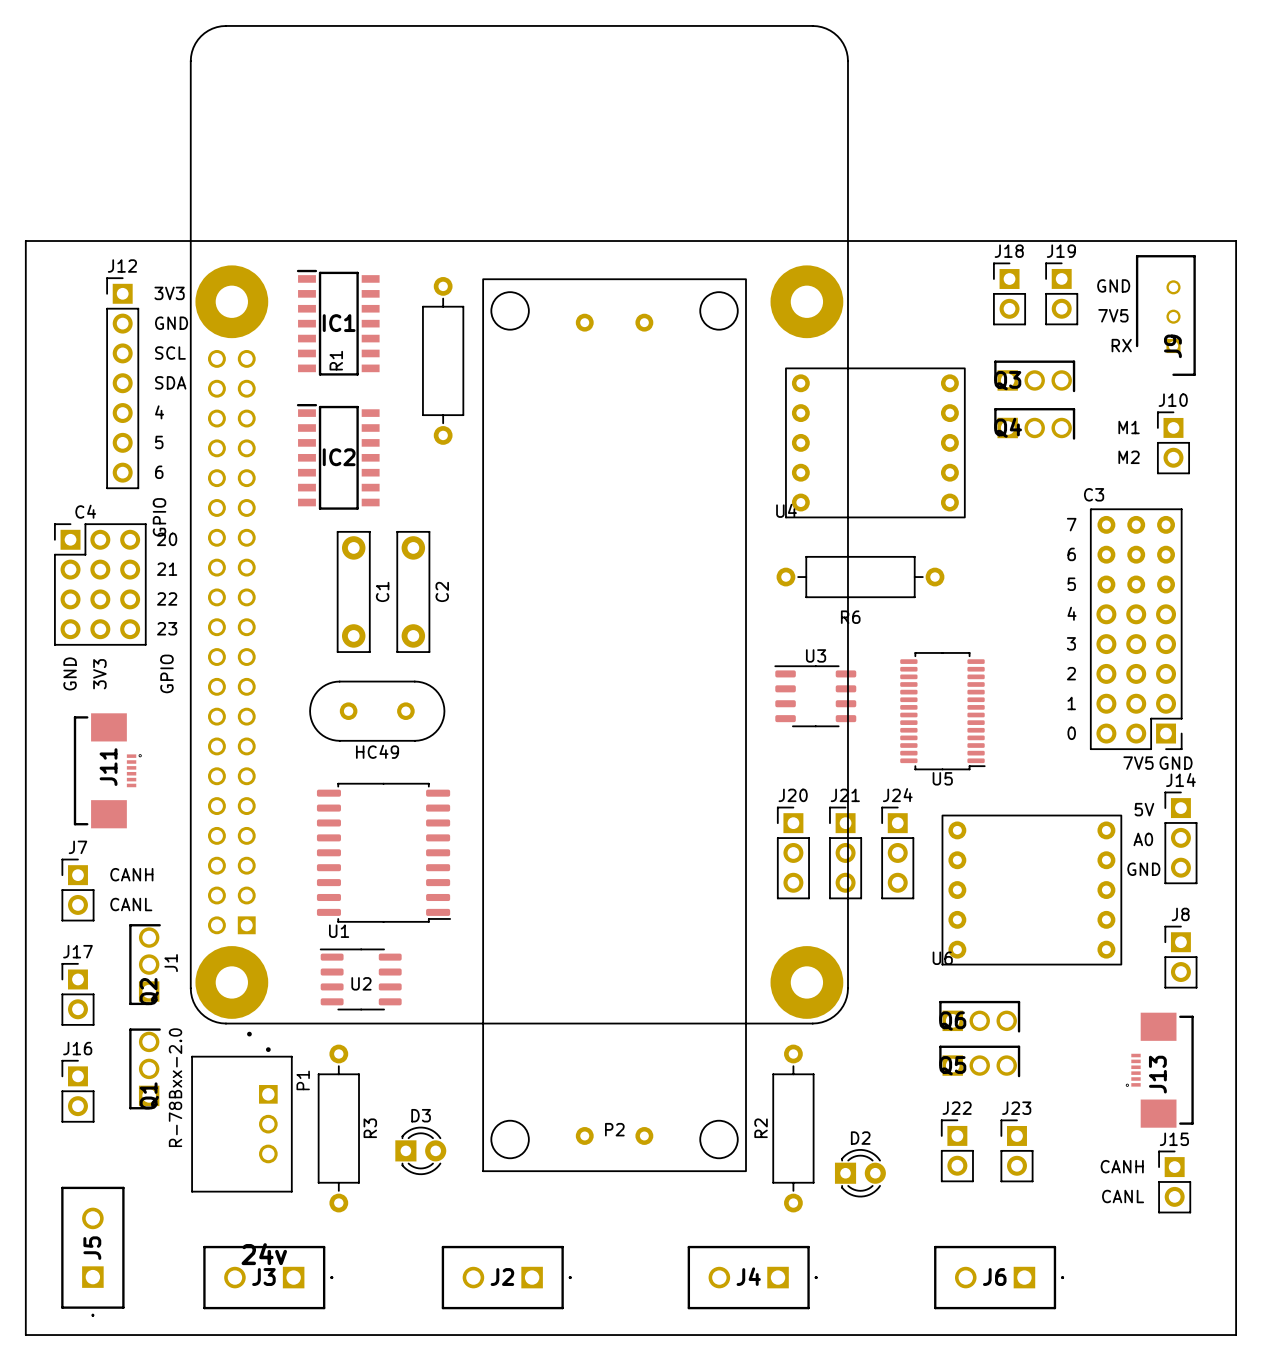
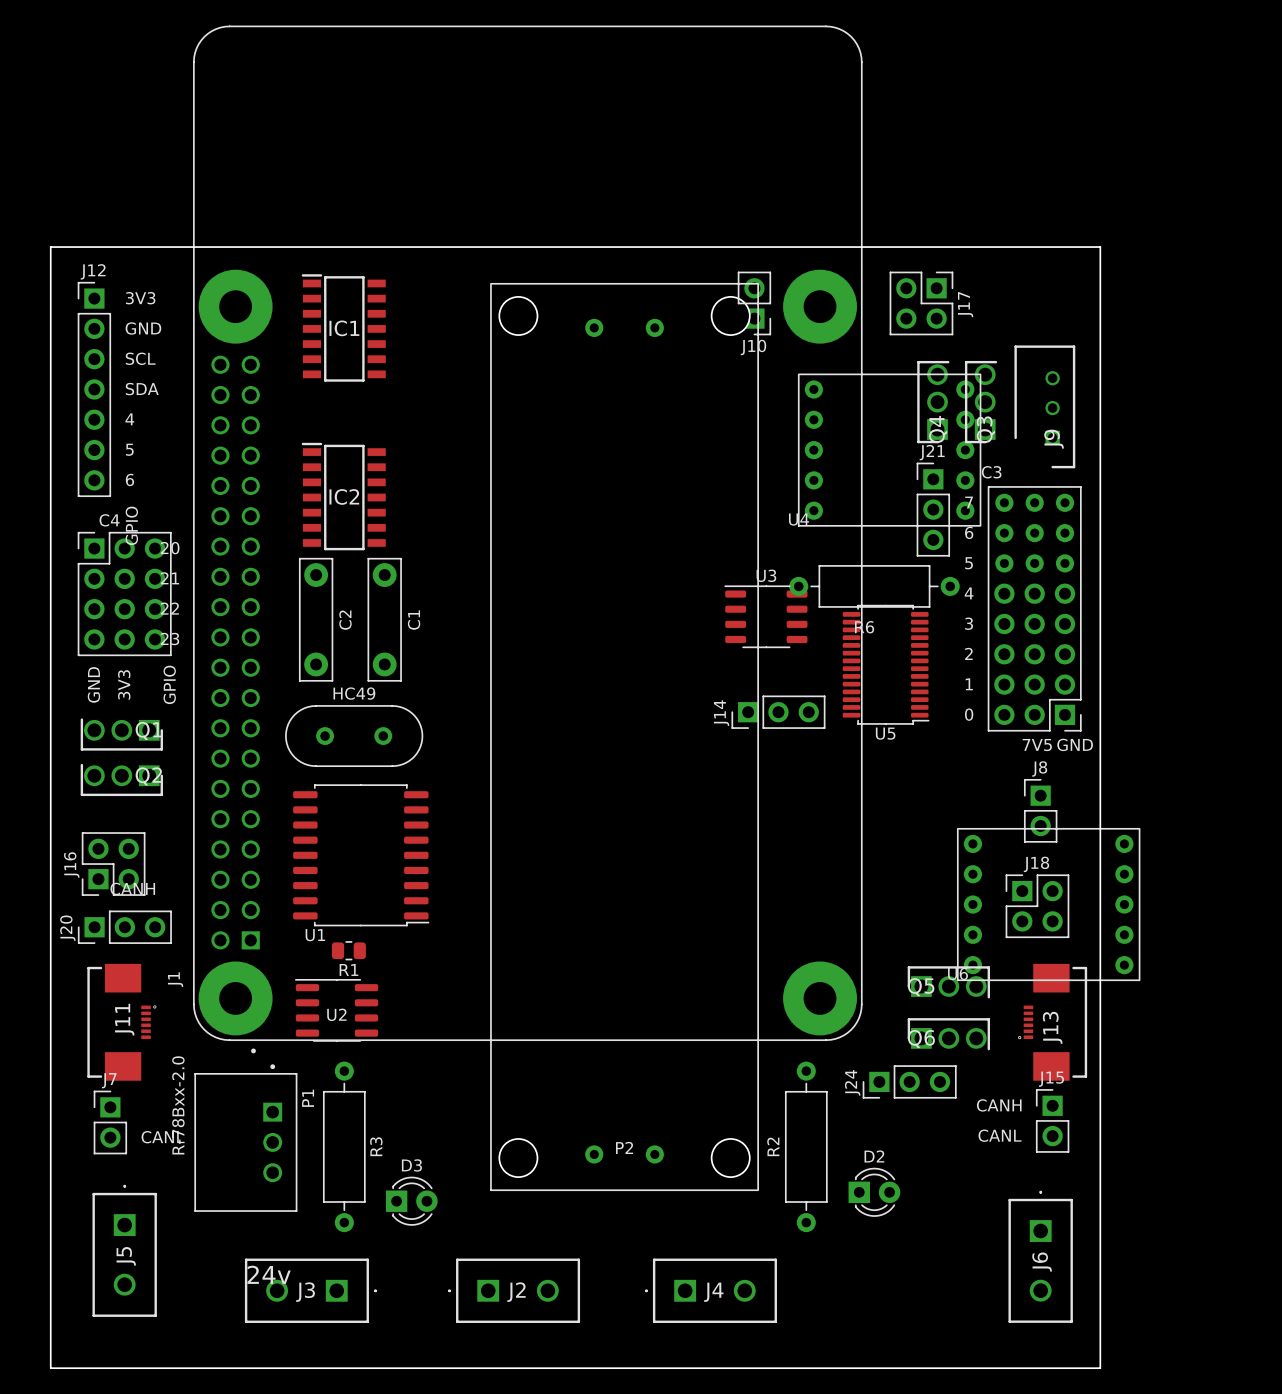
board edge: (25, 241) (1236, 241) (1236, 1335) (25, 1335) (25, 241) -> (50, 247) (50, 1368) (1100, 1368) (1100, 247) (50, 247)
J18 footprint: [993, 262, 1026, 326] -> [1005, 874, 1070, 938]
R1 footprint: [422, 277, 465, 445] -> [331, 941, 366, 961]
text: GND (1113, 285) -> none
text position: 3V3 (169, 293) -> 3V3 (140, 298)
J19: (1061, 293) -> none
text: 7V5 (1113, 315) -> none
J9 position: (1165, 315) -> (1044, 406)
text position: GND (171, 323) -> GND (143, 328)
text: RX (1121, 345) -> none
text position: SCL (170, 353) -> SCL (140, 358)
R1 name position: R1 (336, 360) -> R1 (348, 969)
Q3 rotation: 0° (1034, 376) -> 90° counterclockwise (981, 402)
Q3 position: (1034, 376) -> (981, 402)
text position: SDA (170, 382) -> SDA (142, 389)
J12 position: (122, 383) -> (94, 389)
text position: 4 (159, 412) -> 4 (129, 419)
Q4 rotation: 0° (1034, 423) -> 90° counterclockwise (933, 402)
Q4 position: (1034, 423) -> (933, 402)
text: M1 (1129, 427) -> none
text position: 5 (159, 442) -> 5 (129, 449)
J10 rotation: 0° (1173, 442) -> 180° (754, 303)
J10 position: (1173, 442) -> (754, 303)
IC2 position: (338, 456) -> (343, 496)
text: M2 (1129, 457) -> none
text position: 6 (159, 472) -> 6 (129, 479)
text position: GPIO (159, 517) -> GPIO (131, 525)
text position: 7 (1071, 524) -> 7 (969, 502)
text position: 6 (1071, 554) -> 6 (969, 532)
C4 position: (100, 584) -> (124, 594)
text position: 5 (1071, 584) -> 5 (969, 563)
C1 position: (353, 591) -> (384, 619)
C2 position: (413, 591) -> (316, 619)
text position: 4 (1071, 613) -> 4 (969, 593)
C3 position: (1136, 629) -> (1034, 608)
text position: 3 (1071, 643) -> 3 (969, 623)
text position: GND (70, 673) -> GND (93, 684)
text position: 2 (1071, 673) -> 2 (968, 653)
text position: 3V3 (99, 674) -> 3V3 (124, 684)
U3 position: (815, 696) -> (766, 616)
text position: 1 (1071, 703) -> 1 (969, 684)
HC49 rotation: 0° (377, 711) -> 180° (354, 736)
U5 position: (942, 711) -> (885, 664)
text: none -> GND (1075, 744)
text position: 0 (1071, 733) -> 0 (969, 714)
text position: 7V5 (1138, 763) -> 7V5 (1037, 745)
text: GND (1176, 763) -> none
J11 position: (107, 770) -> (121, 1022)
text: 5V (1144, 809) -> none
J14 rotation: 0° (1180, 837) -> 90° counterclockwise (778, 712)
J14 position: (1180, 837) -> (778, 712)
text: A0 (1143, 839) -> none
U1 position: (383, 852) -> (361, 855)
J20 rotation: 0° (793, 852) -> 90° counterclockwise (124, 927)
J20 position: (793, 852) -> (124, 927)
J21 position: (845, 852) -> (933, 509)
J24 rotation: 0° (897, 852) -> 90° counterclockwise (909, 1081)
J24 position: (897, 852) -> (909, 1081)
text: GND (1143, 869) -> none
J7 position: (77, 890) -> (110, 1122)
text position: CANL (131, 904) -> CANL (163, 1137)
J17 name position: J17 (77, 951) -> J17 (965, 304)
J8 position: (1180, 957) -> (1040, 810)
J17 footprint: [61, 963, 95, 1026] -> [889, 271, 954, 336]
Q2 rotation: 0° (145, 964) -> 90° counterclockwise (121, 779)
Q2 position: (145, 964) -> (121, 779)
U2 position: (360, 979) -> (336, 1010)
Q6 position: (979, 1016) -> (948, 1034)
J16 name position: J16 (77, 1048) -> J16 (71, 864)
J16 footprint: [61, 1060, 95, 1123] -> [81, 832, 146, 896]
Q5 position: (979, 1061) -> (948, 982)
Q1 rotation: 0° (145, 1068) -> 90° counterclockwise (121, 734)
Q1 position: (145, 1068) -> (121, 734)
J13 position: (1159, 1070) -> (1052, 1022)
D3 position: (420, 1150) -> (411, 1201)
J22: (957, 1150) -> none
J23: (1016, 1150) -> none
text position: CANH (1122, 1166) -> CANH (999, 1105)
J15 position: (1174, 1181) -> (1052, 1120)
text position: CANL (1123, 1196) -> CANL (1000, 1135)
J5 rotation: 0° (92, 1251) -> 180° (124, 1251)
J3 position: (268, 1277) -> (310, 1290)
J2 rotation: 0° (506, 1277) -> 180° (514, 1290)
J4 rotation: 0° (752, 1277) -> 180° (711, 1290)
J6 rotation: 0° (998, 1277) -> 90° counterclockwise (1040, 1256)

